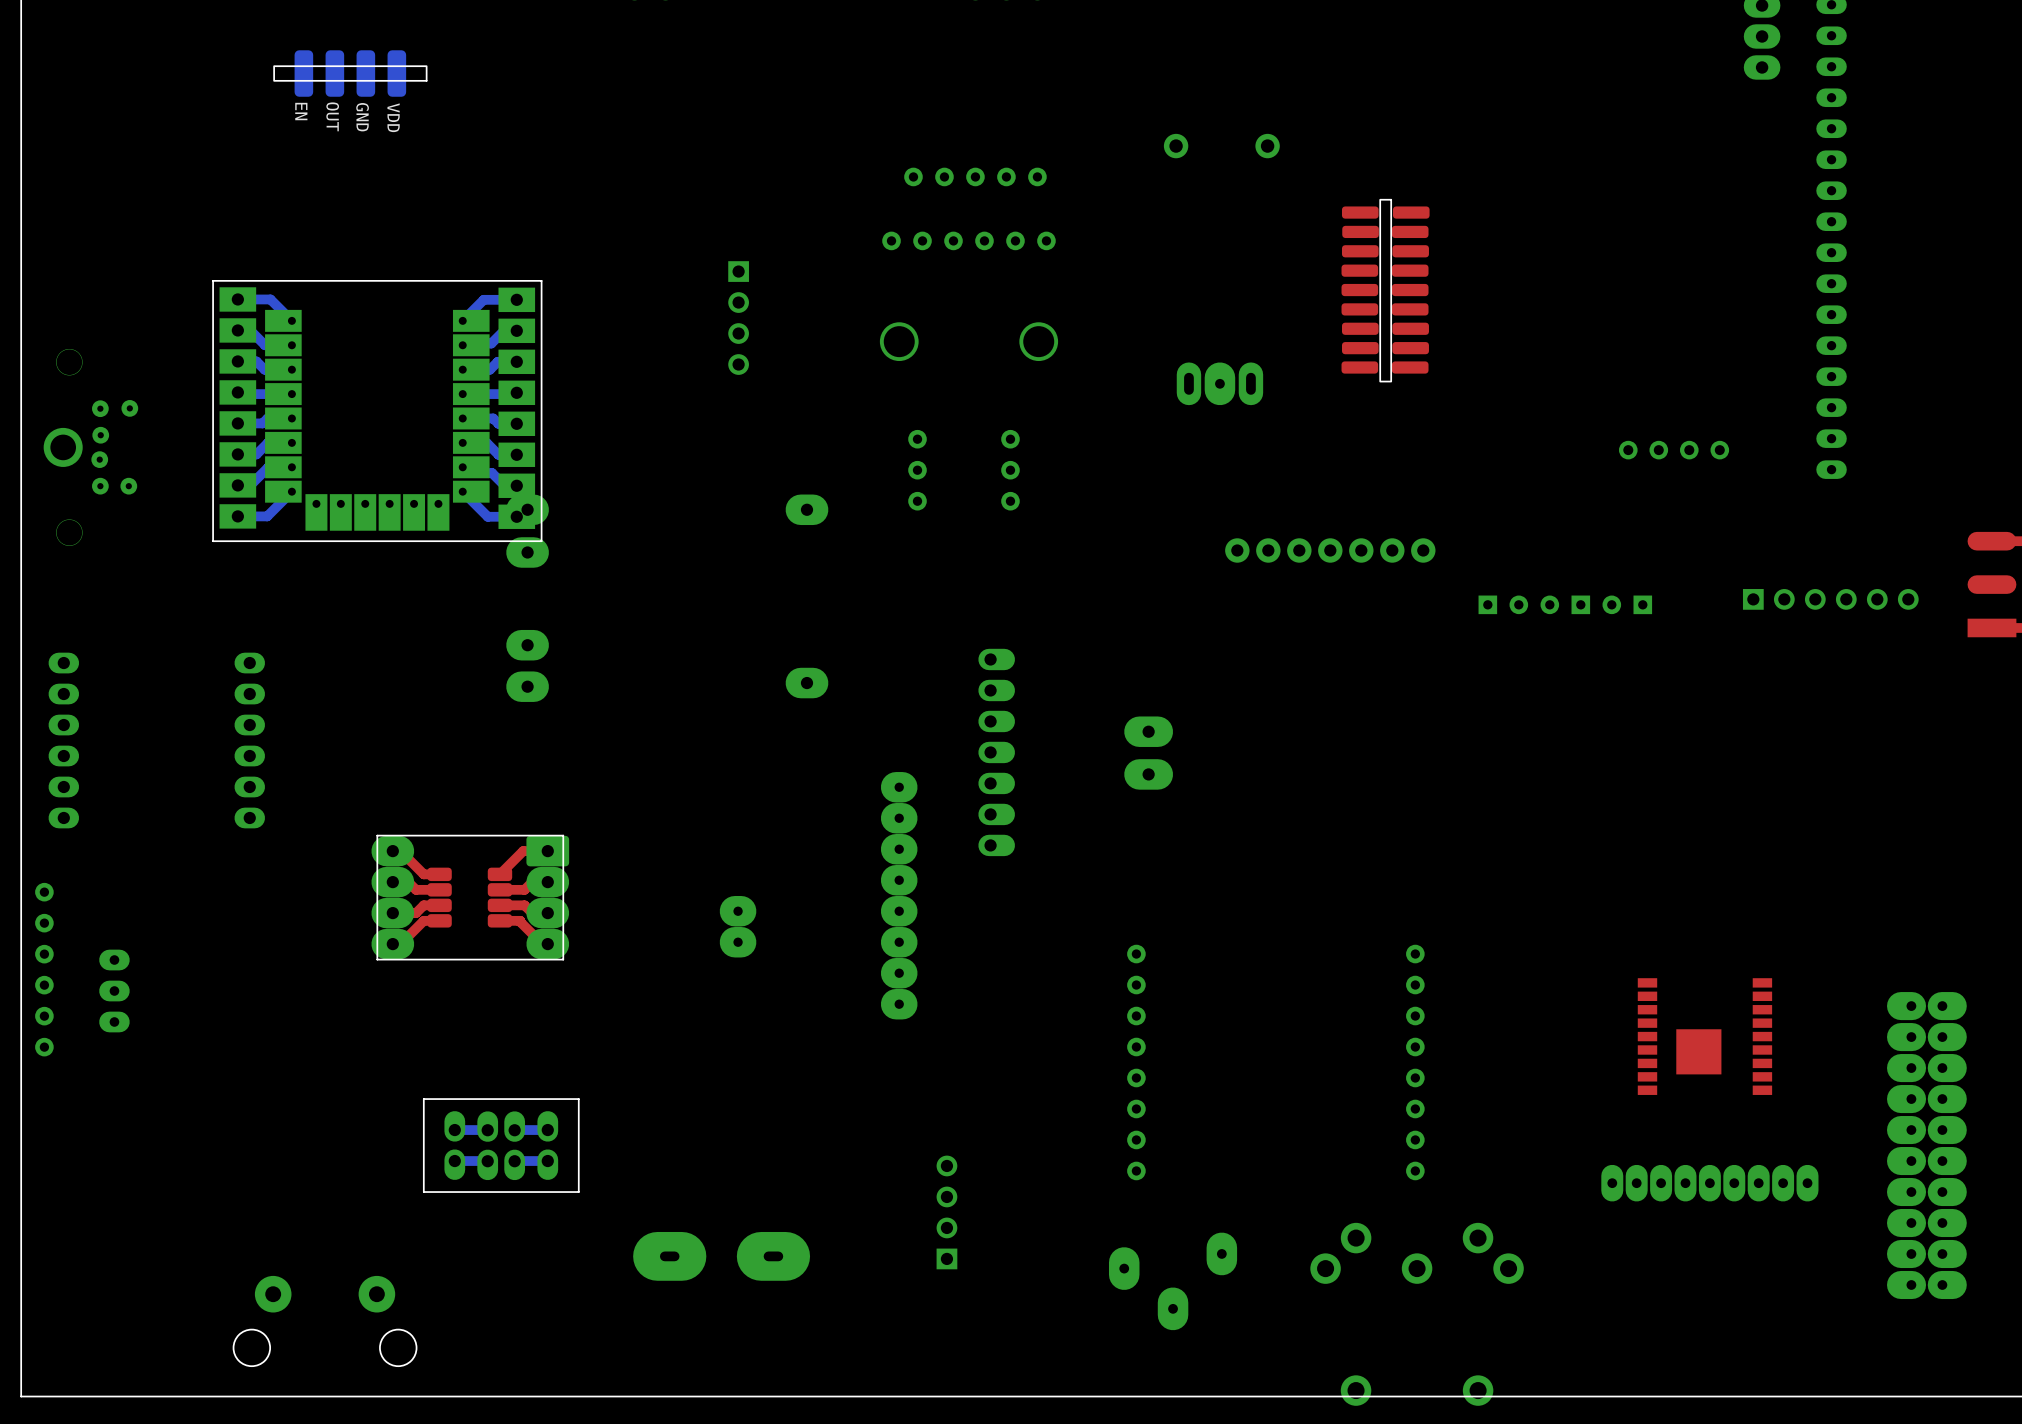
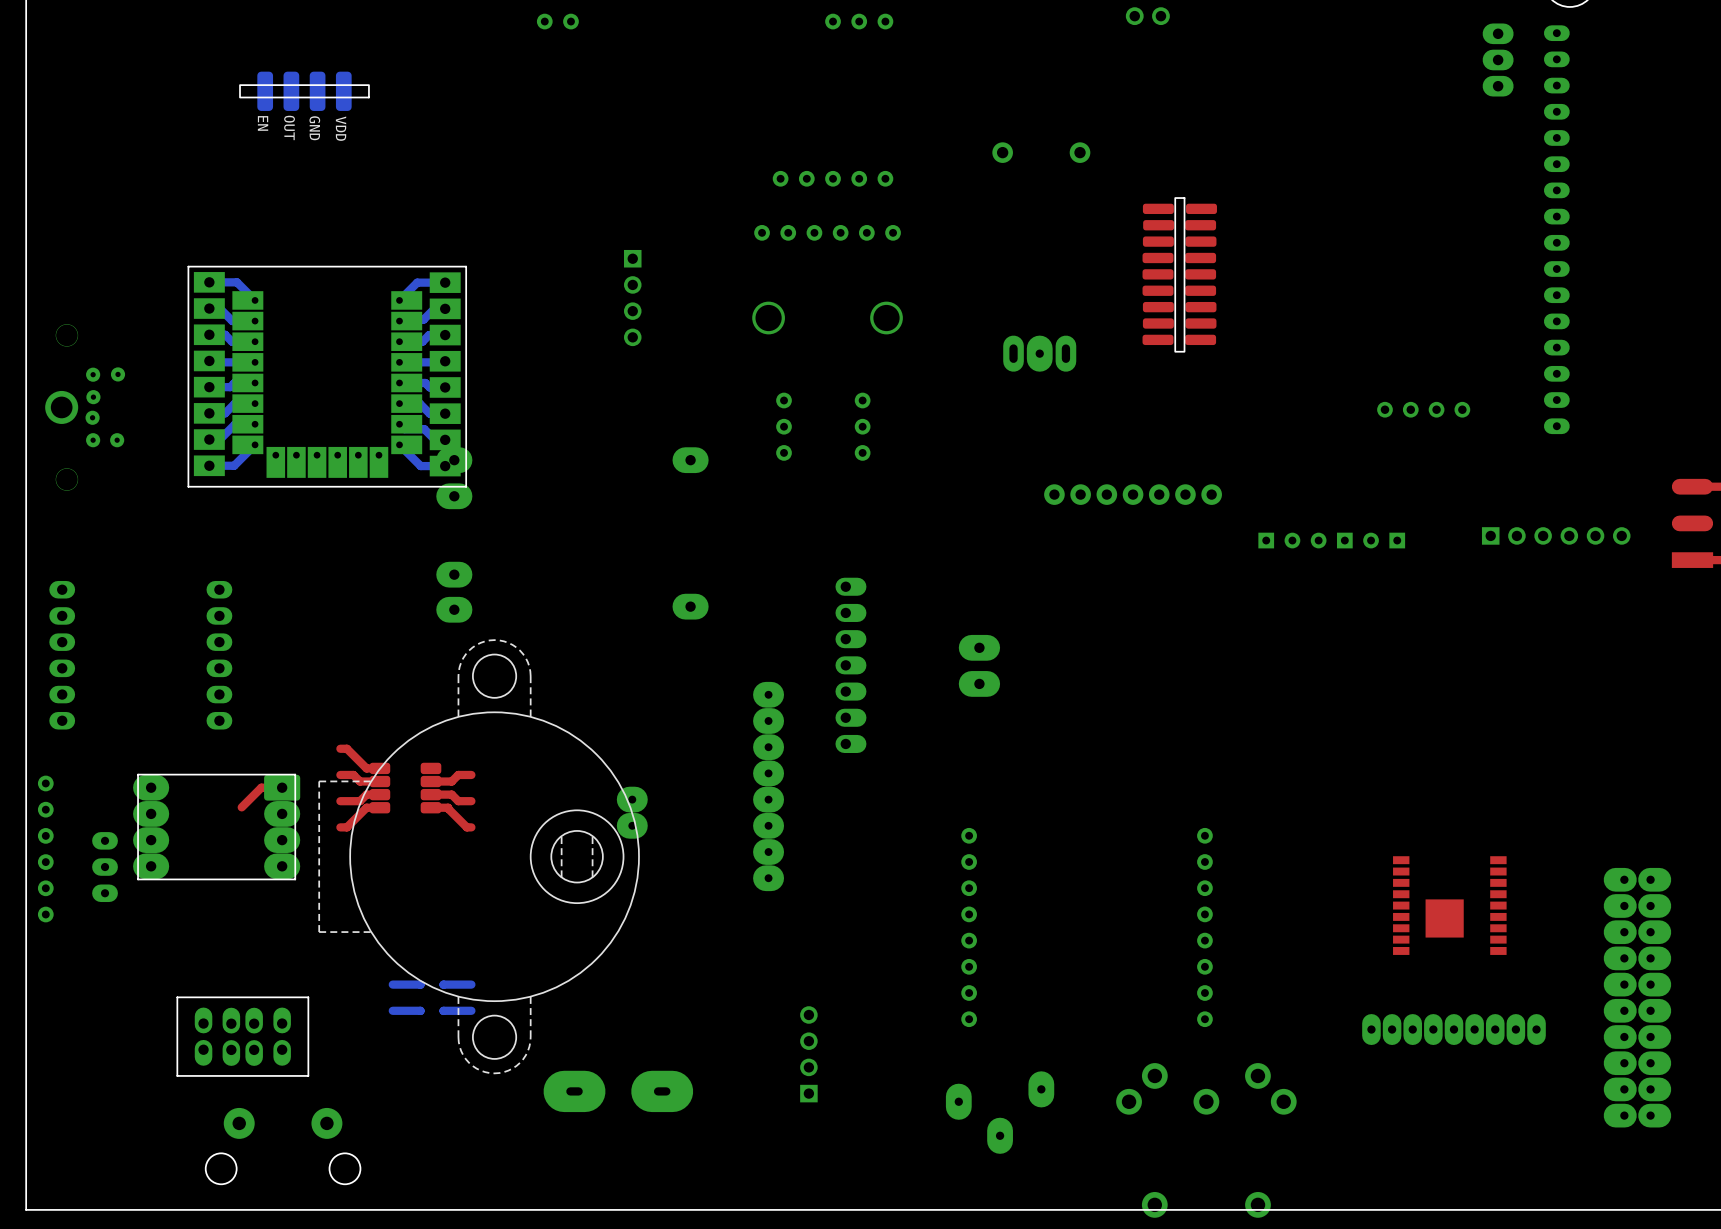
drawing: none -> [318, 639, 640, 1075]
board edge: (563, 835) (377, 835) (377, 959) (563, 959) (563, 835) -> (295, 774) (138, 774) (138, 879) (295, 879) (295, 774)
top track: (547, 851) (523, 851) (499, 874) -> (282, 787) (261, 787) (241, 807)
part position: (392, 897) -> (151, 827)
part position: (547, 897) -> (282, 827)
board edge: (578, 1099) (423, 1099) (423, 1192) (578, 1192) (578, 1099) -> (308, 997) (177, 997) (177, 1075) (308, 1075) (308, 997)
part: (454, 1145) -> none
part position: (501, 1145) -> (242, 1036)
part: (547, 1145) -> none
part: none -> (203, 1036)
part: none -> (282, 1036)

